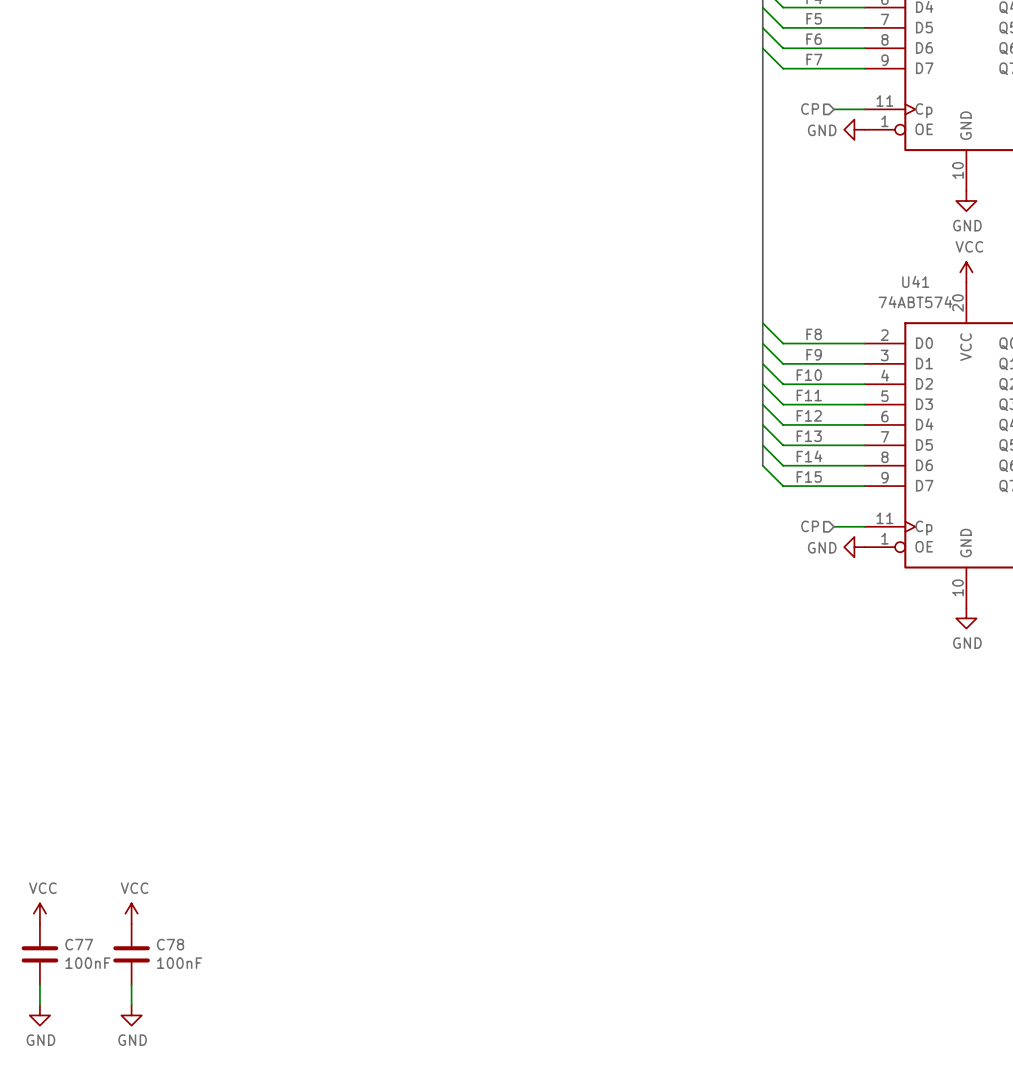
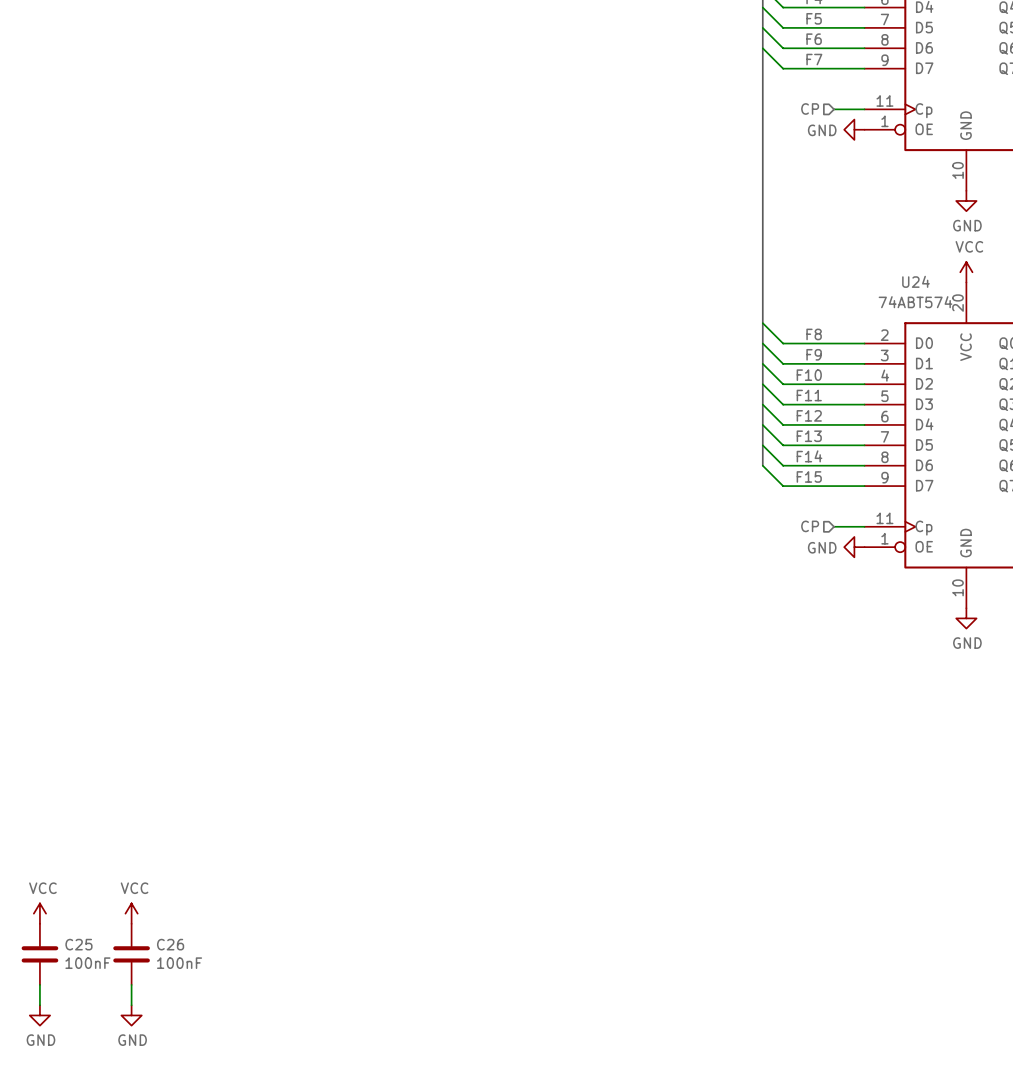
U41 name: U41 (915, 281) -> U24 (915, 281)
C77 name: C77 (79, 944) -> C25 (78, 944)
C78 name: C78 (170, 944) -> C26 (170, 944)

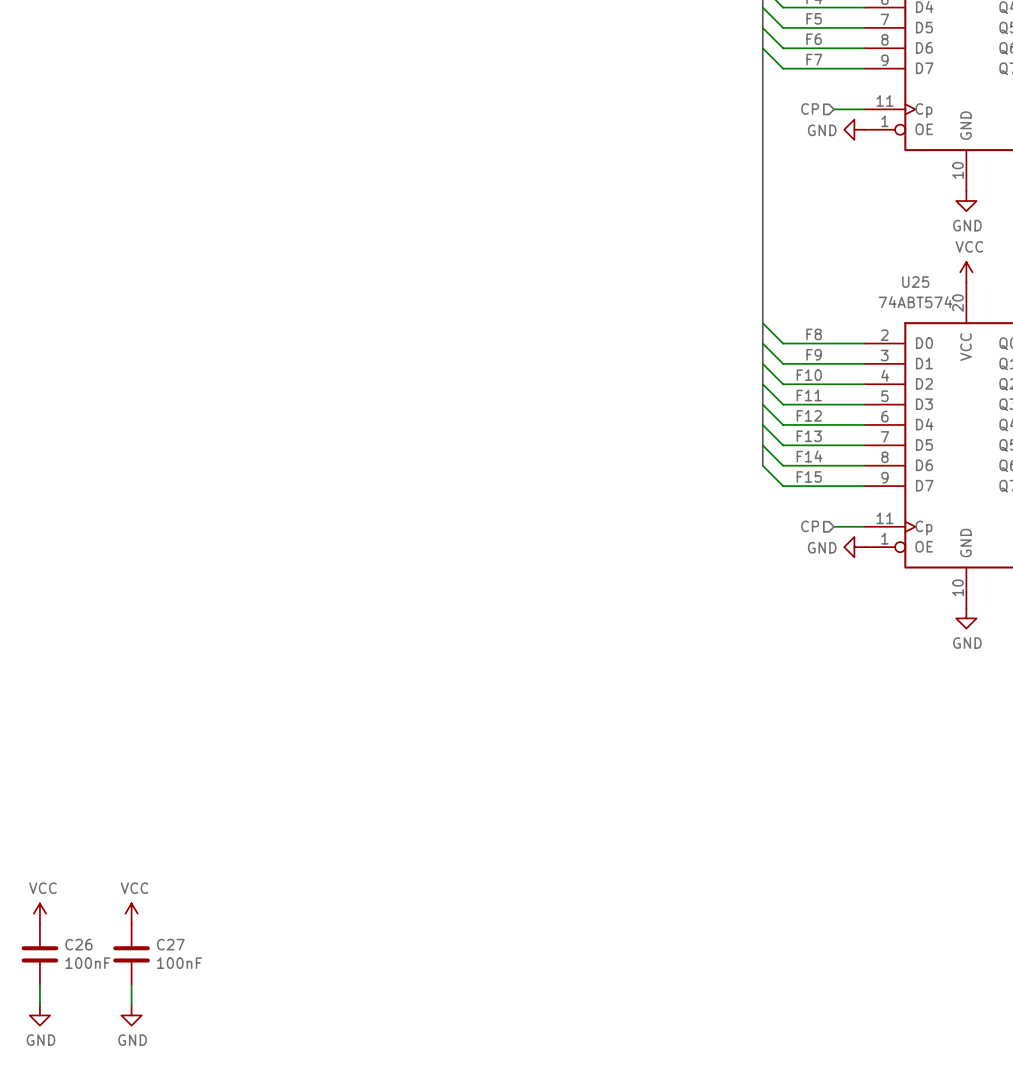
U24 name: U24 (915, 281) -> U25 (915, 282)
C25 name: C25 (78, 944) -> C26 (78, 944)
C26 name: C26 (170, 944) -> C27 (170, 944)

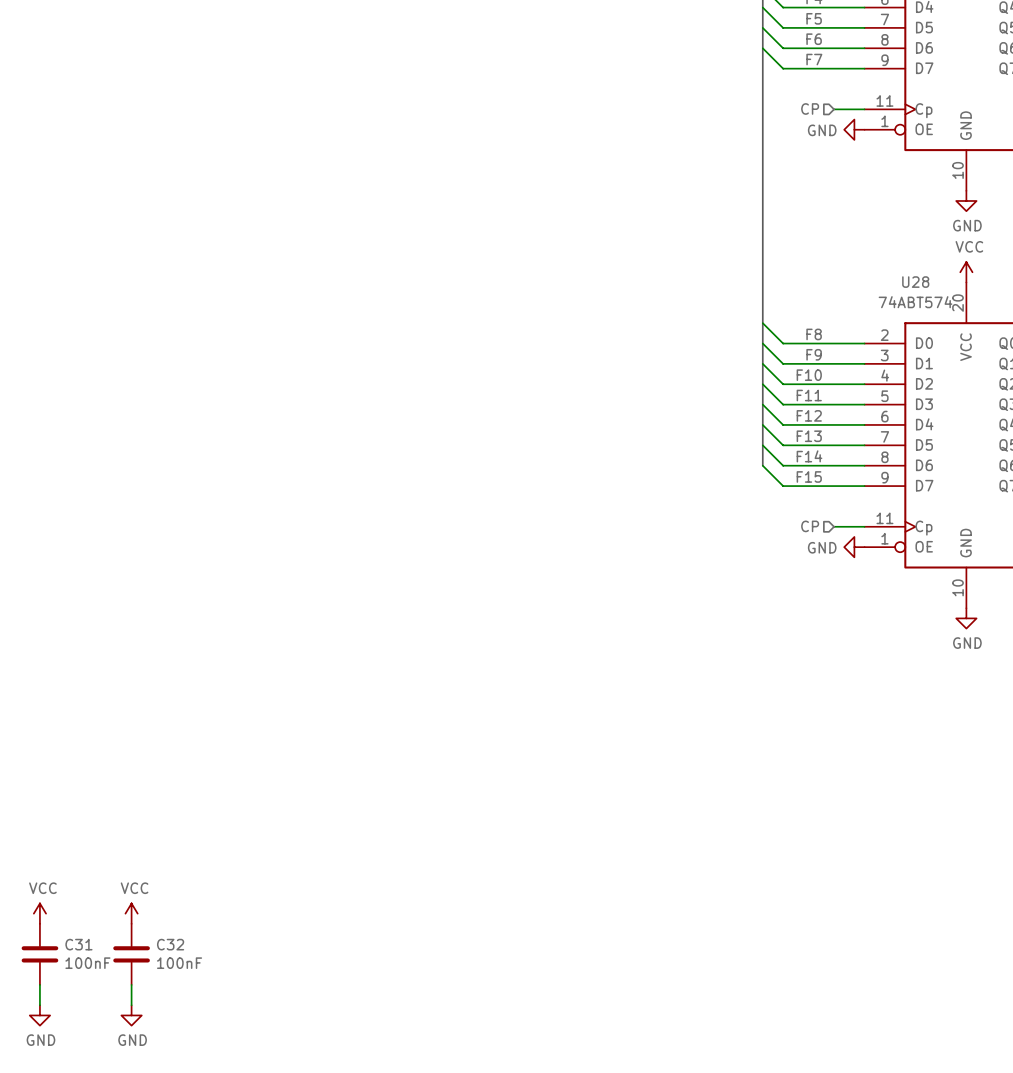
U25 name: U25 (915, 282) -> U28 (915, 282)
C26 name: C26 (78, 944) -> C31 (78, 944)
C27 name: C27 (170, 944) -> C32 (170, 944)

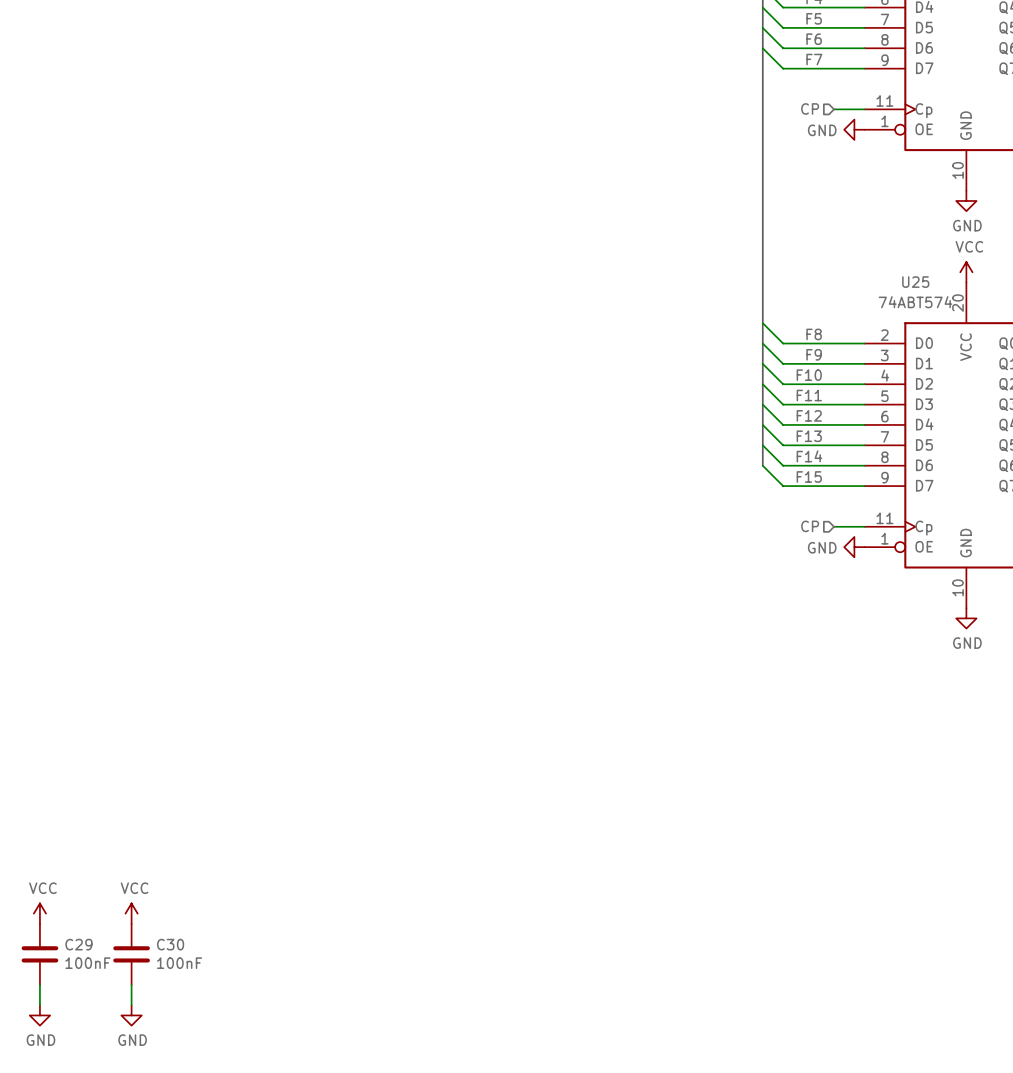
U28 name: U28 (915, 282) -> U25 (915, 282)
C31 name: C31 (78, 944) -> C29 (78, 944)
C32 name: C32 (170, 944) -> C30 (170, 944)

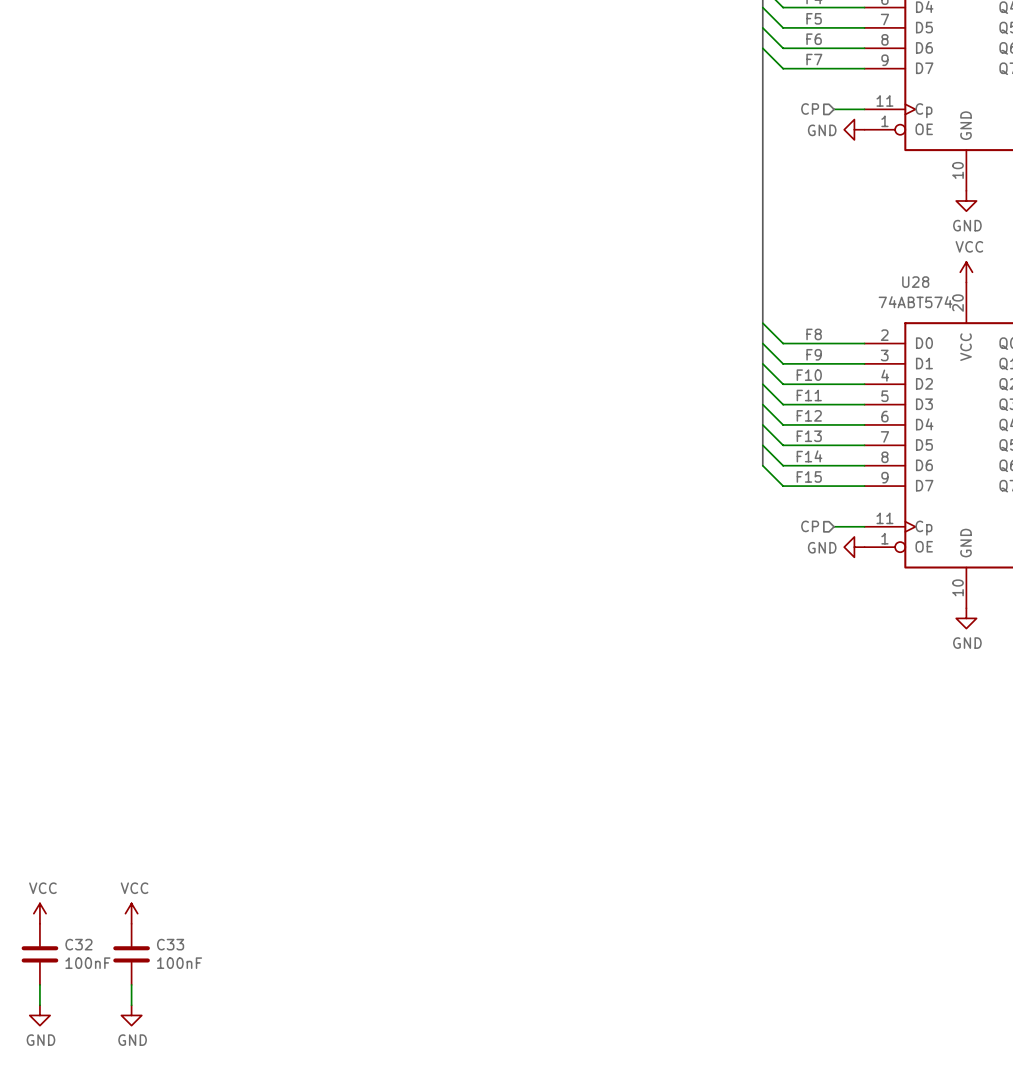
U25 name: U25 (915, 282) -> U28 (915, 282)
C29 name: C29 (78, 944) -> C32 (78, 944)
C30 name: C30 (170, 944) -> C33 (170, 944)

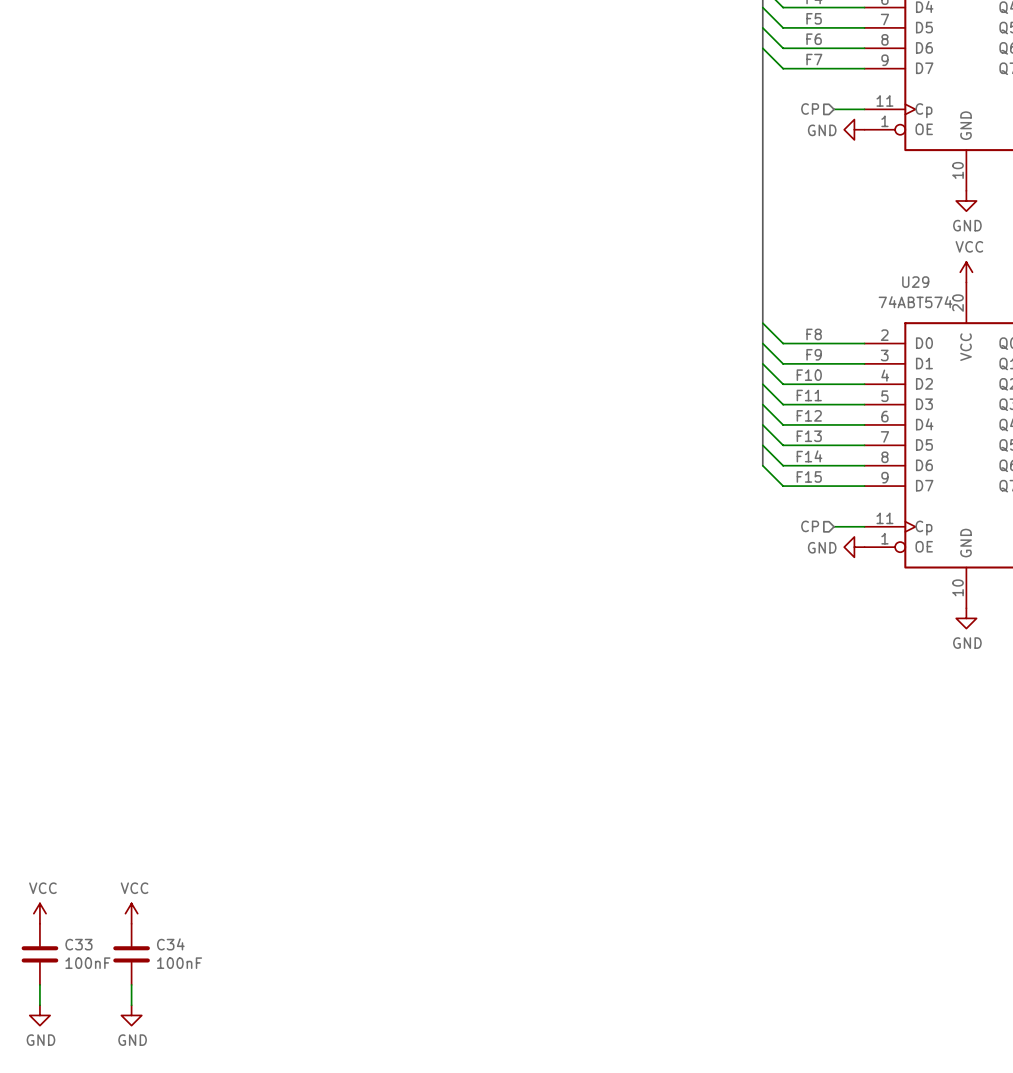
U28 name: U28 (915, 282) -> U29 (915, 282)
C32 name: C32 (78, 944) -> C33 (78, 944)
C33 name: C33 (170, 944) -> C34 (170, 944)

